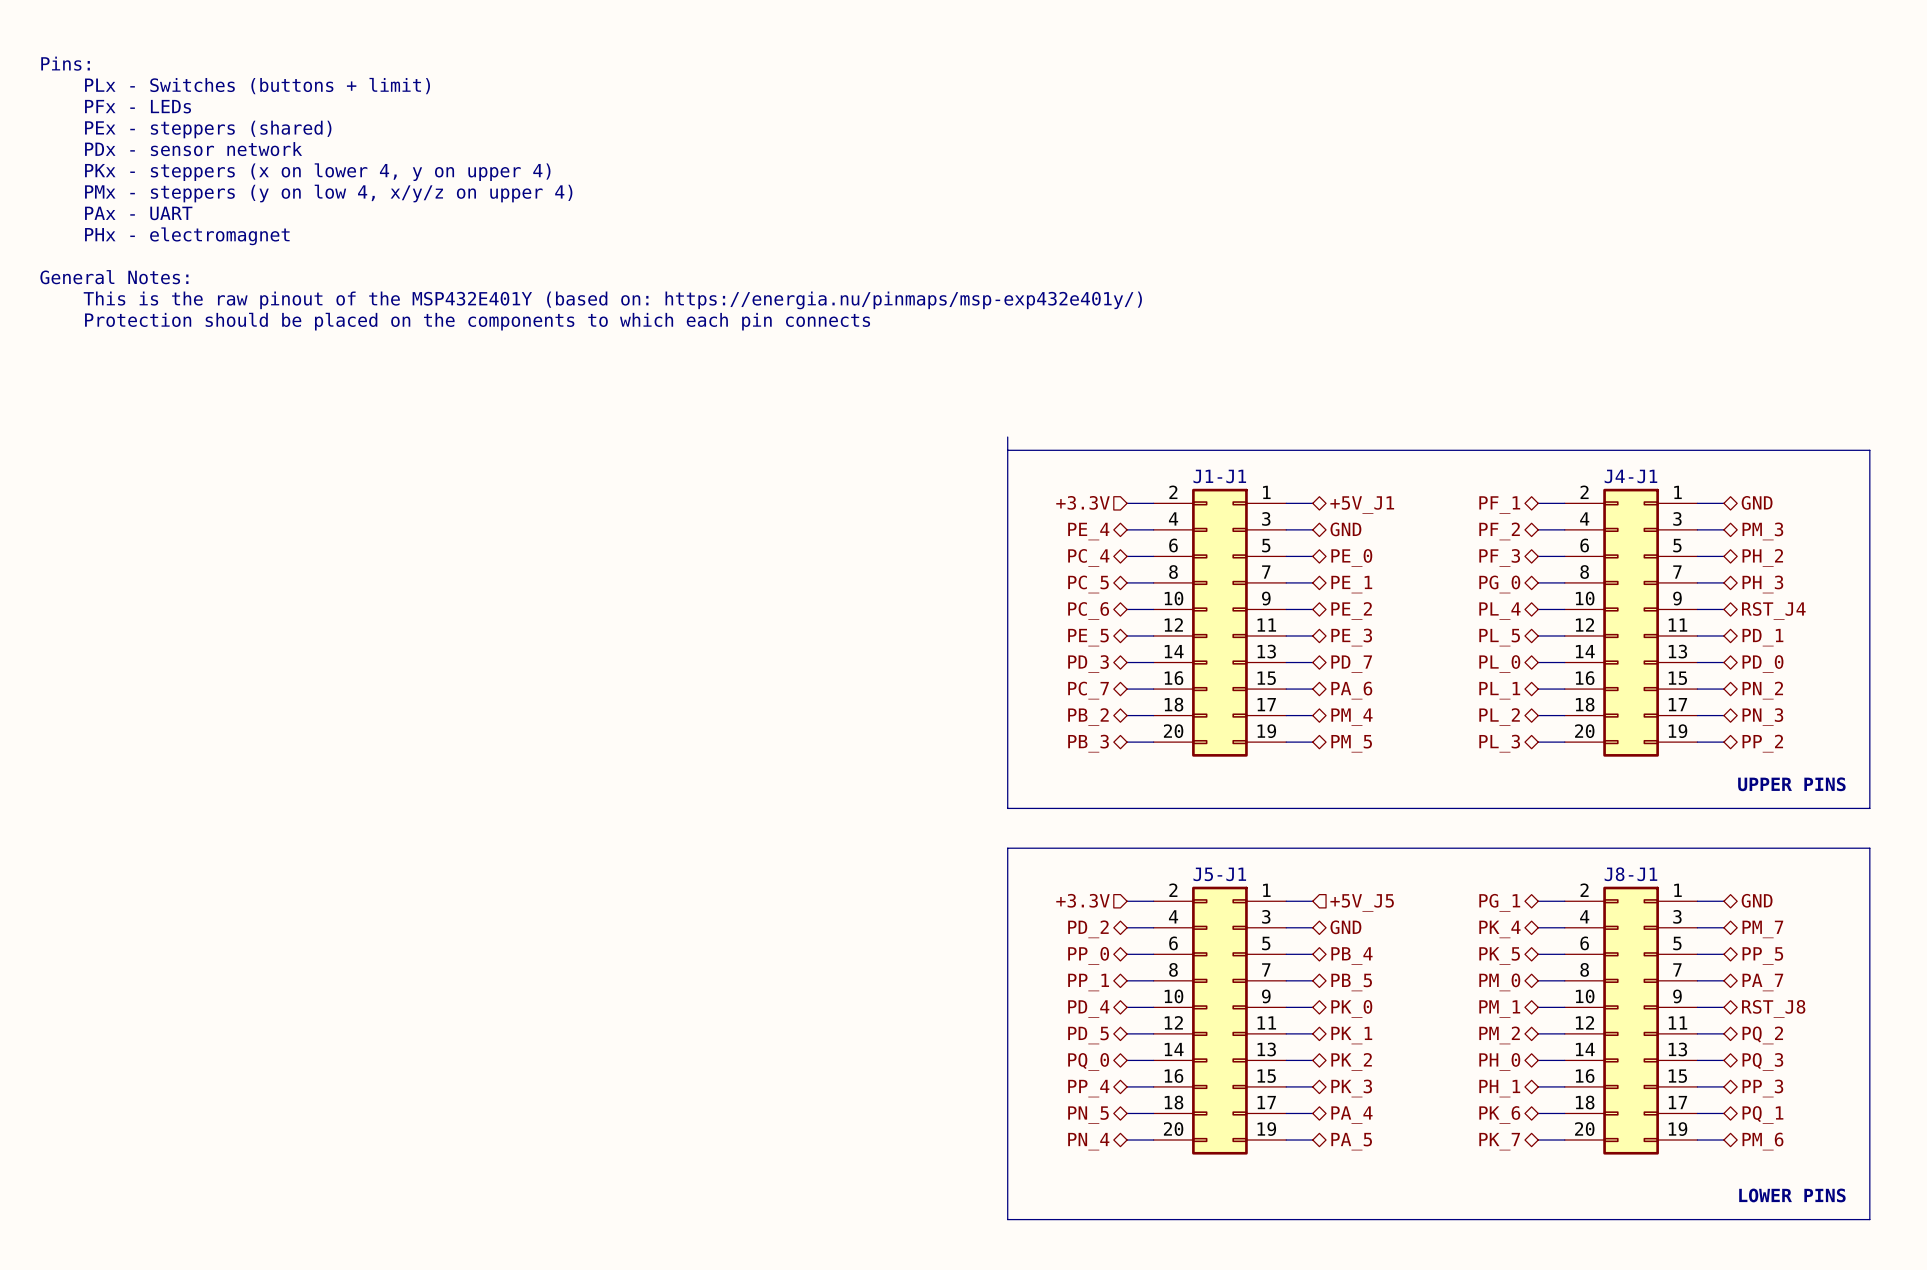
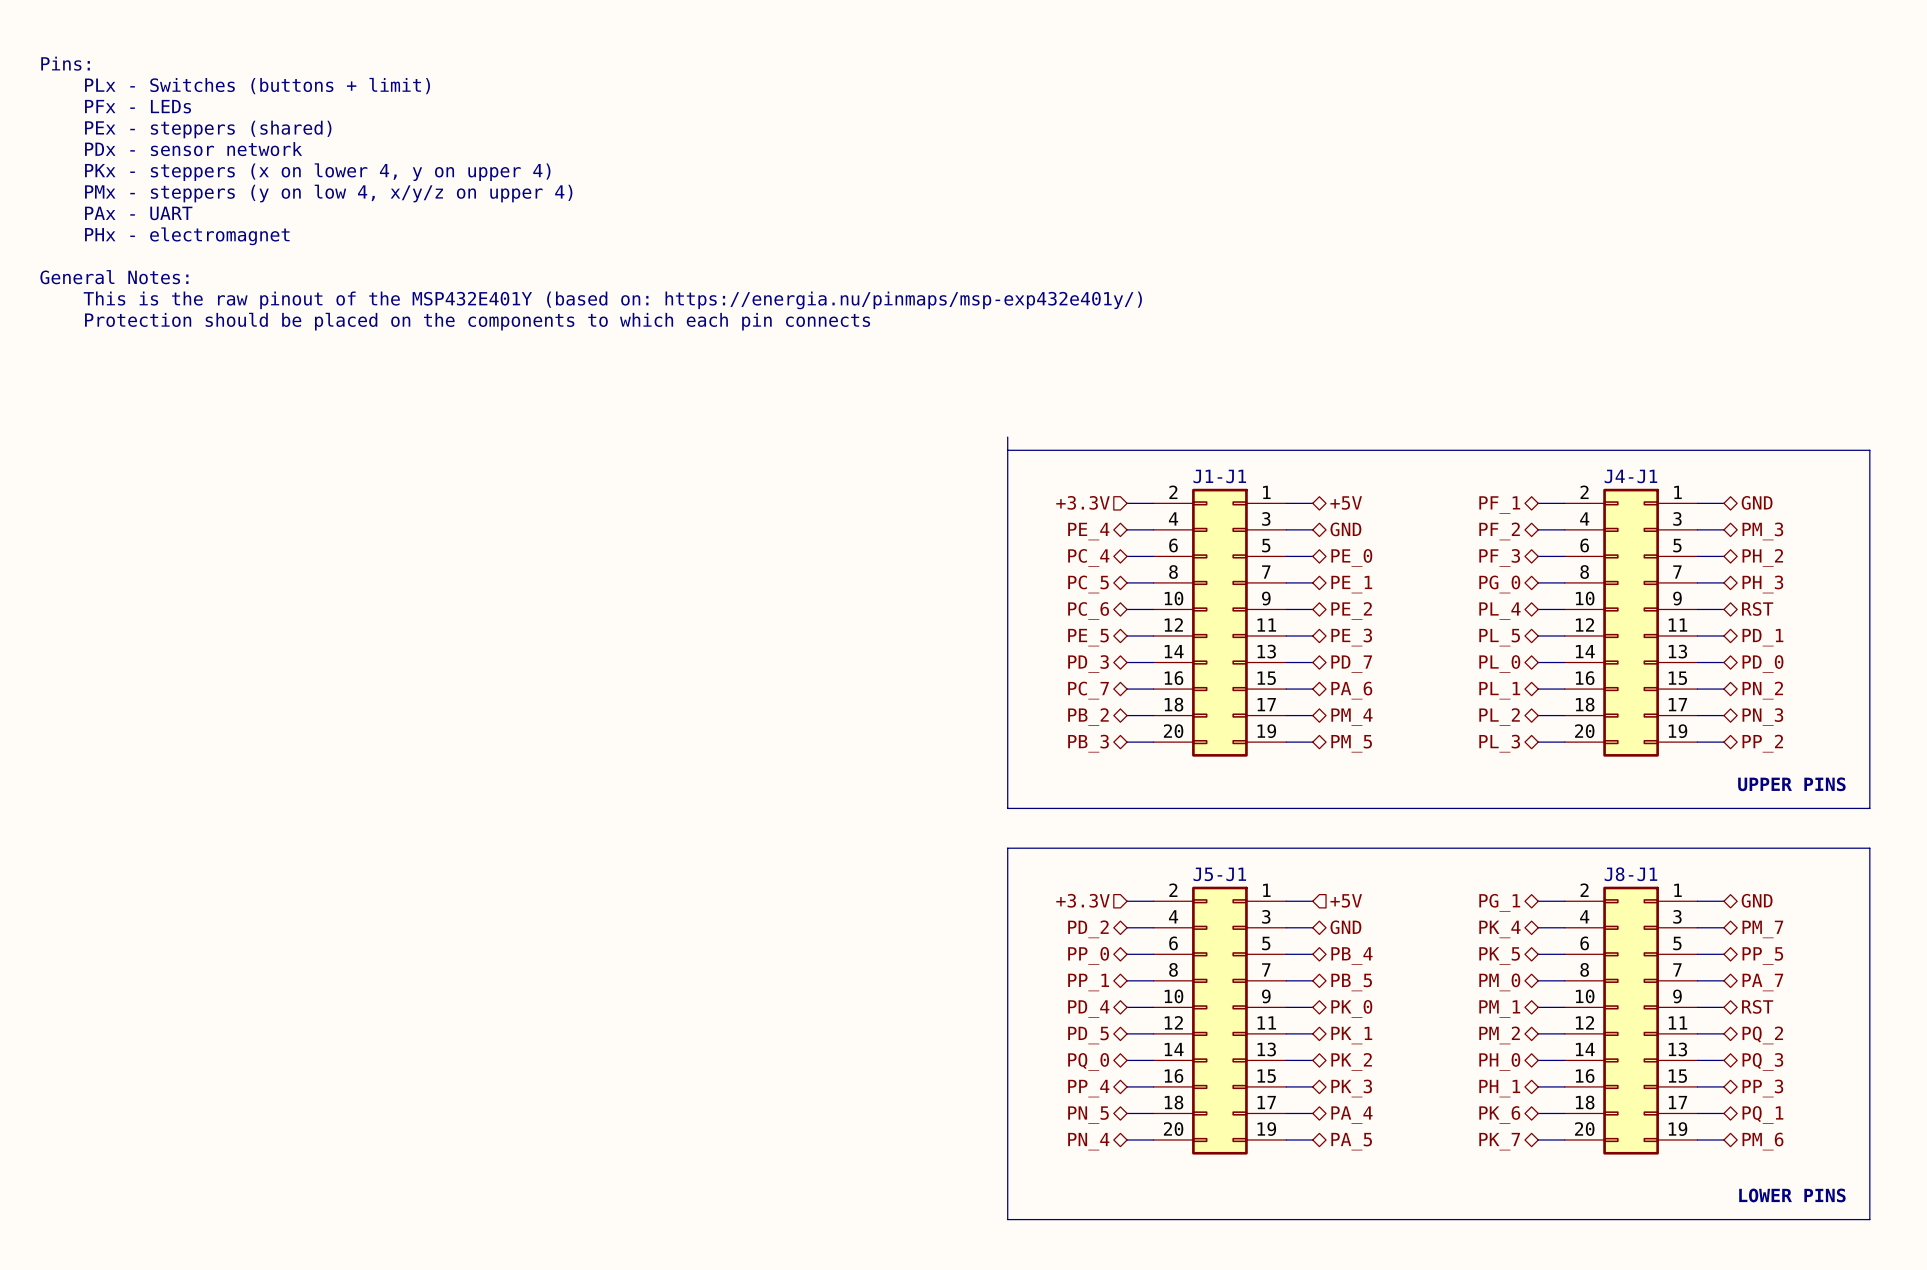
hierarchical label: +5V_J1 (1362, 505) -> +5V (1346, 502)
hierarchical label: RST_J4 (1773, 611) -> RST (1757, 608)
hierarchical label: +5V_J5 (1362, 902) -> +5V (1346, 900)
hierarchical label: RST_J8 (1773, 1008) -> RST (1757, 1006)

